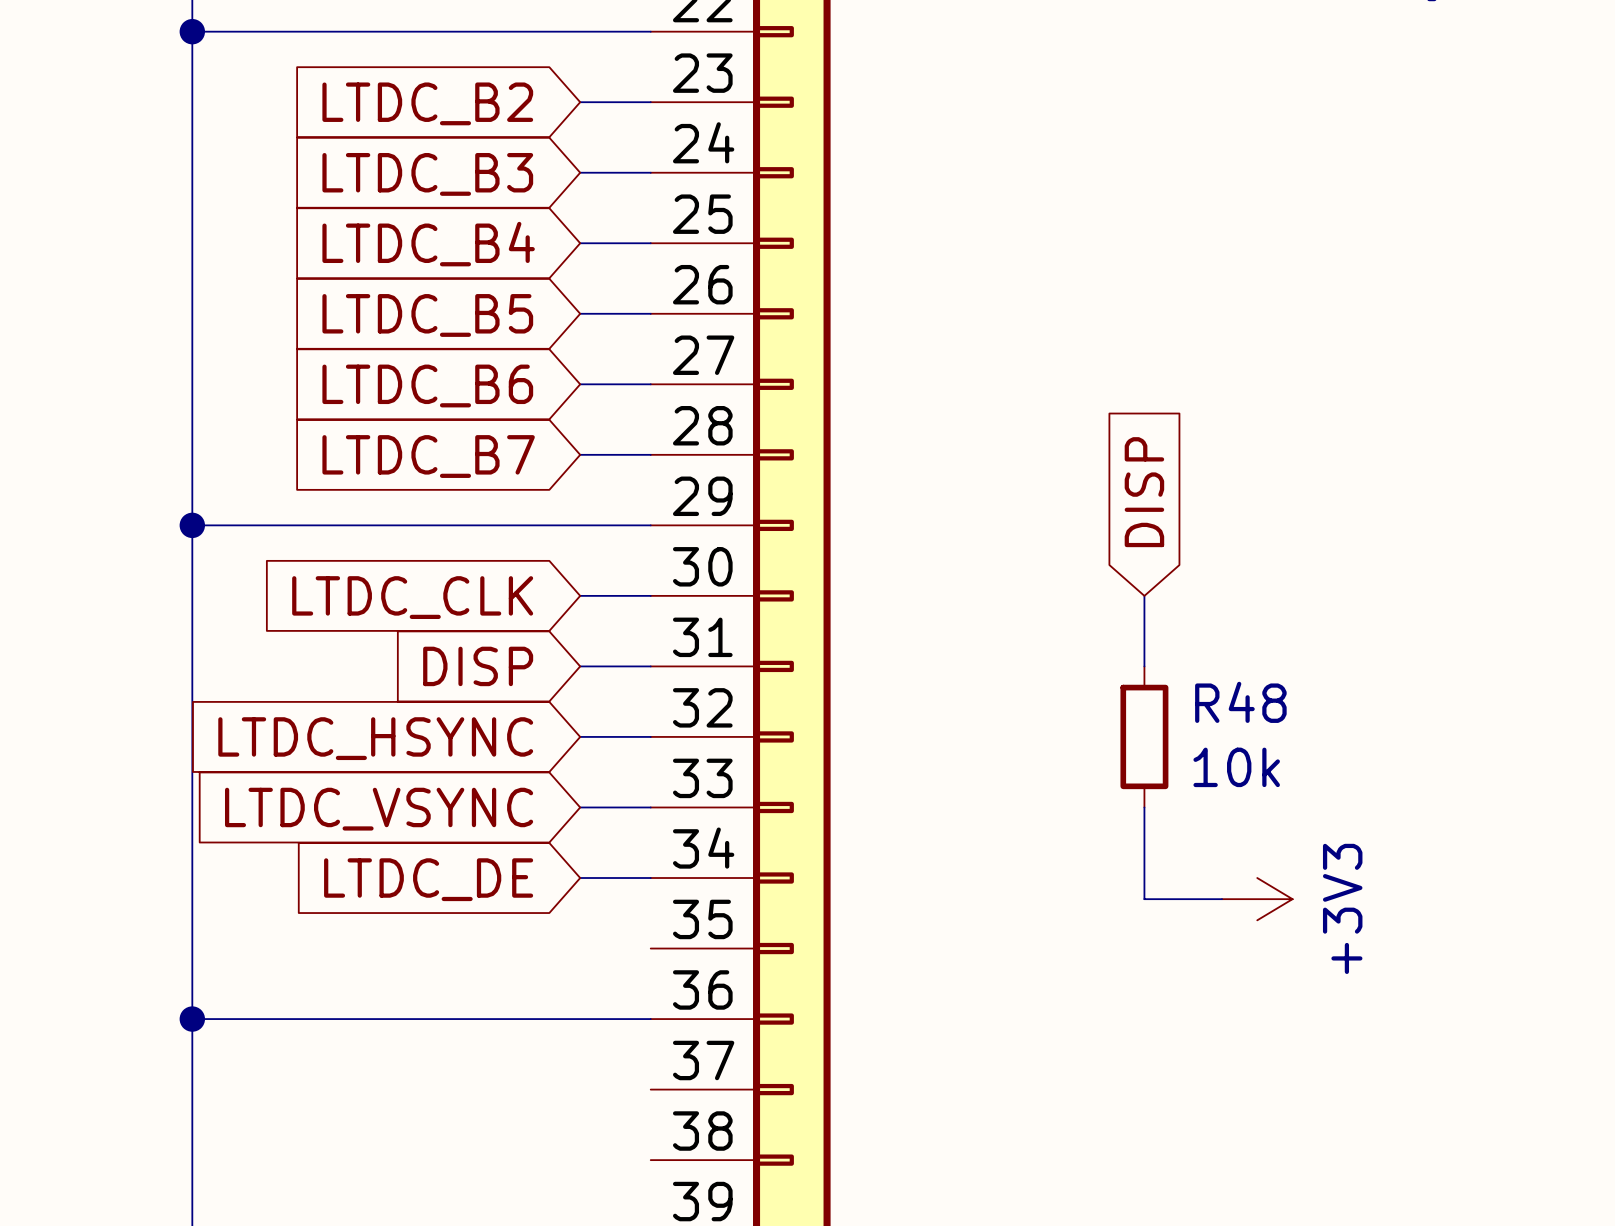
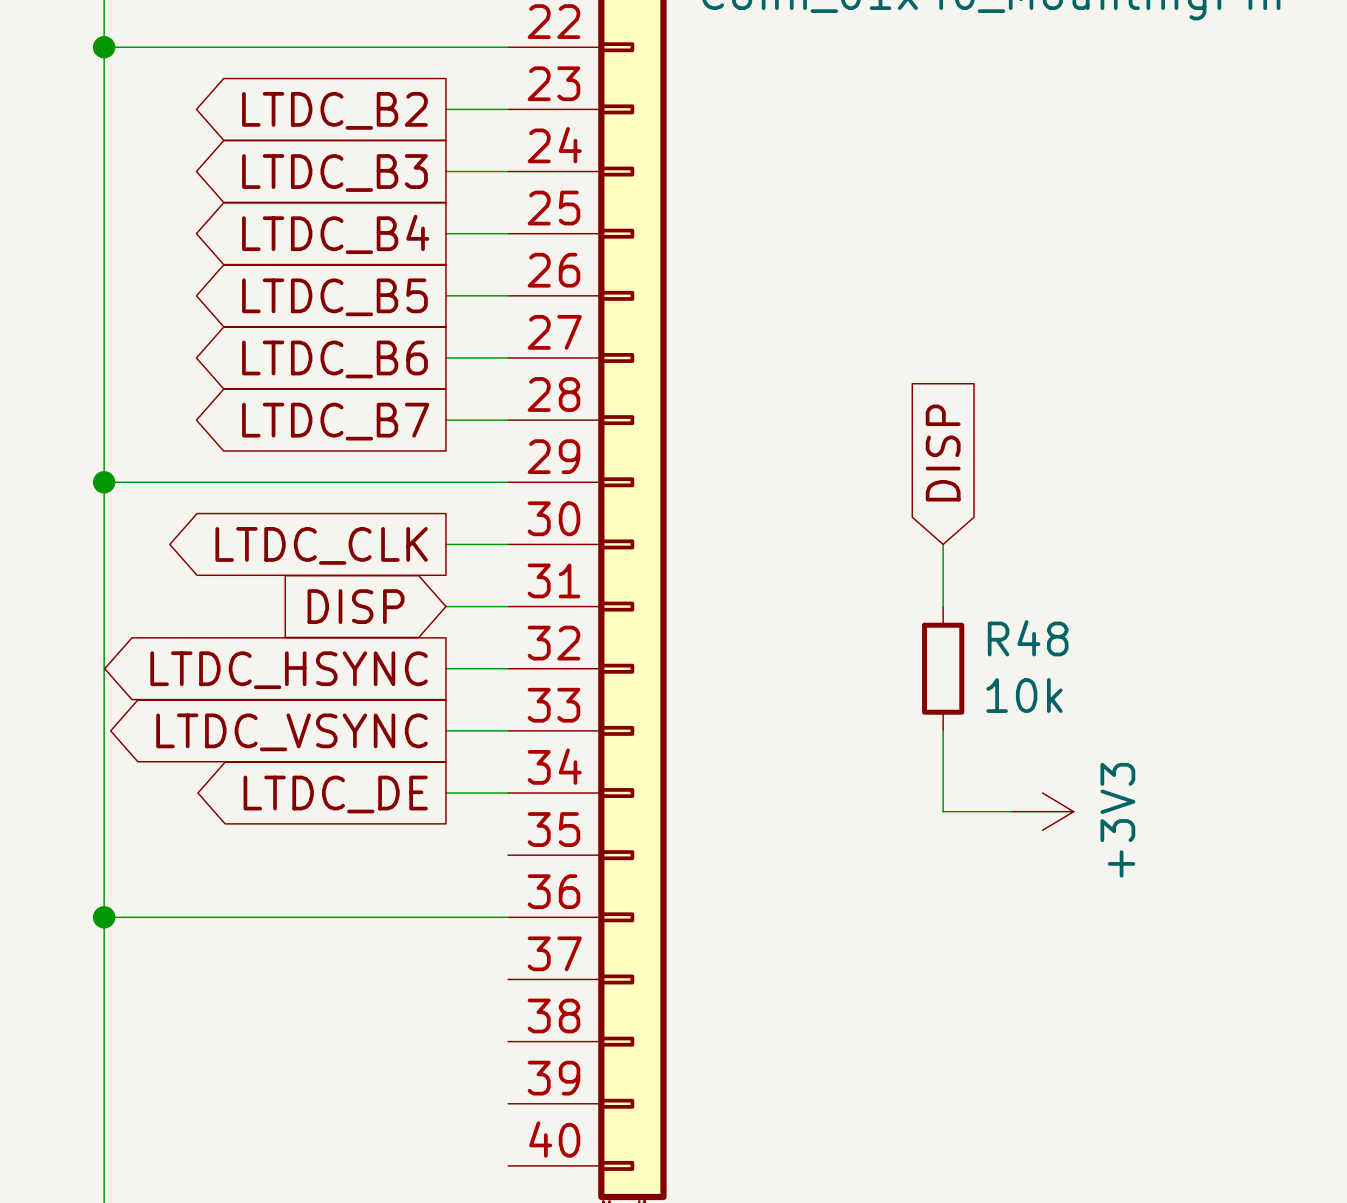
global label shape: input (427, 103) -> output (334, 110)
global label shape: input (427, 174) -> output (334, 173)
global label shape: input (428, 244) -> output (335, 234)
global label shape: input (427, 315) -> output (334, 297)
global label shape: input (427, 385) -> output (334, 359)
global label shape: input (428, 456) -> output (335, 421)
global label shape: input (412, 597) -> output (321, 545)
global label shape: input (375, 738) -> output (289, 670)
global label shape: input (379, 809) -> output (292, 732)
global label shape: input (428, 879) -> output (335, 794)

